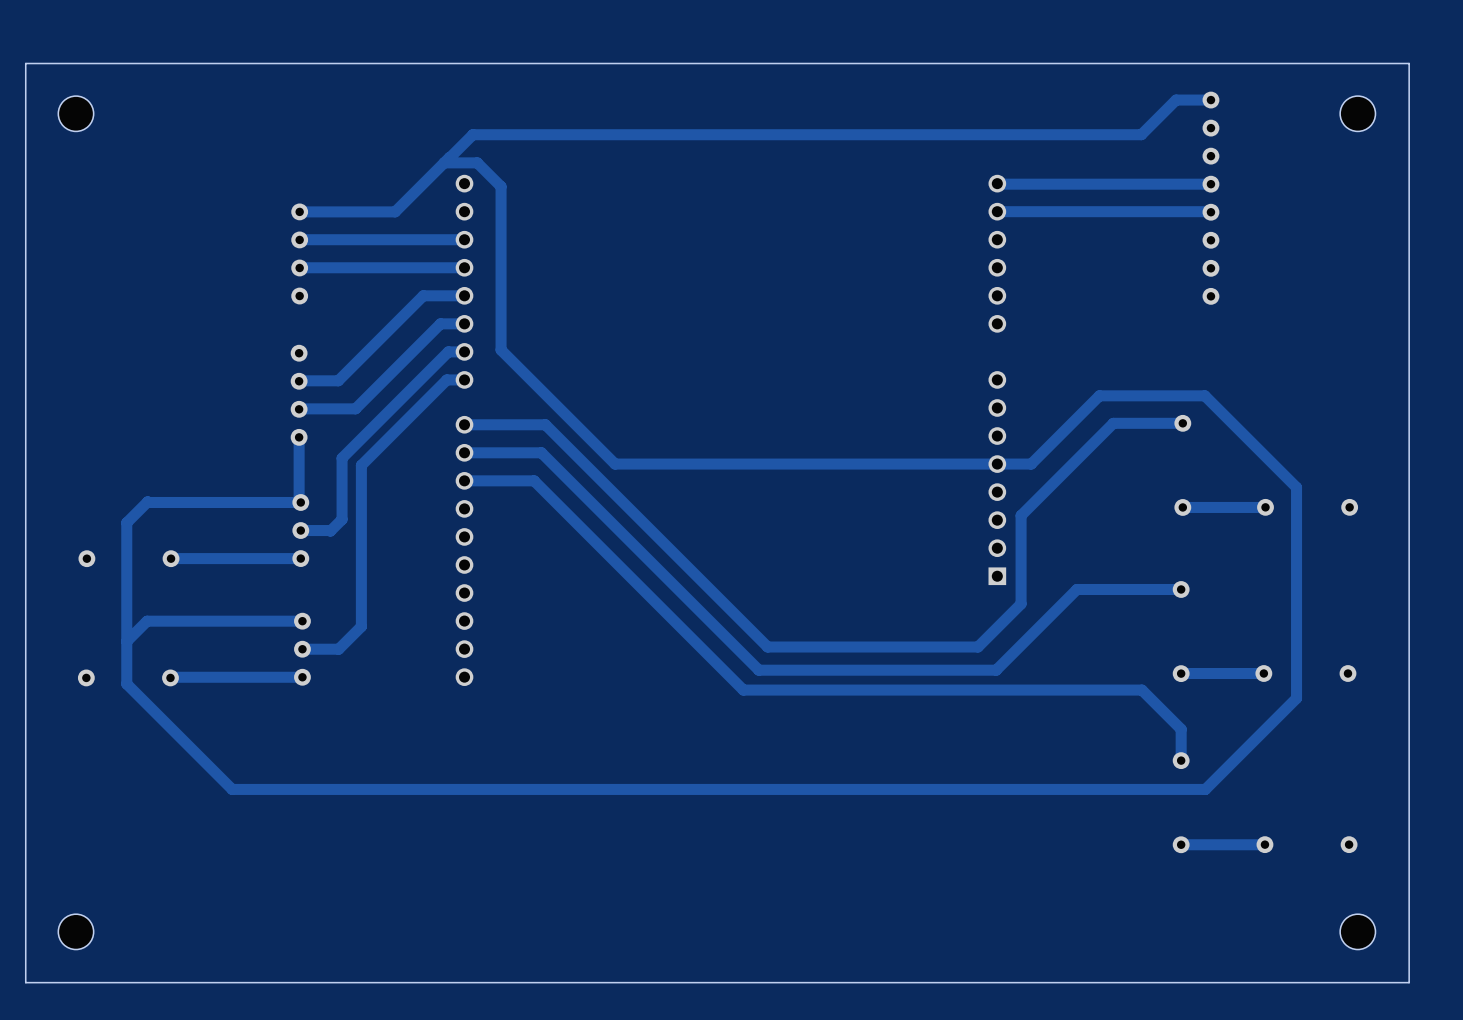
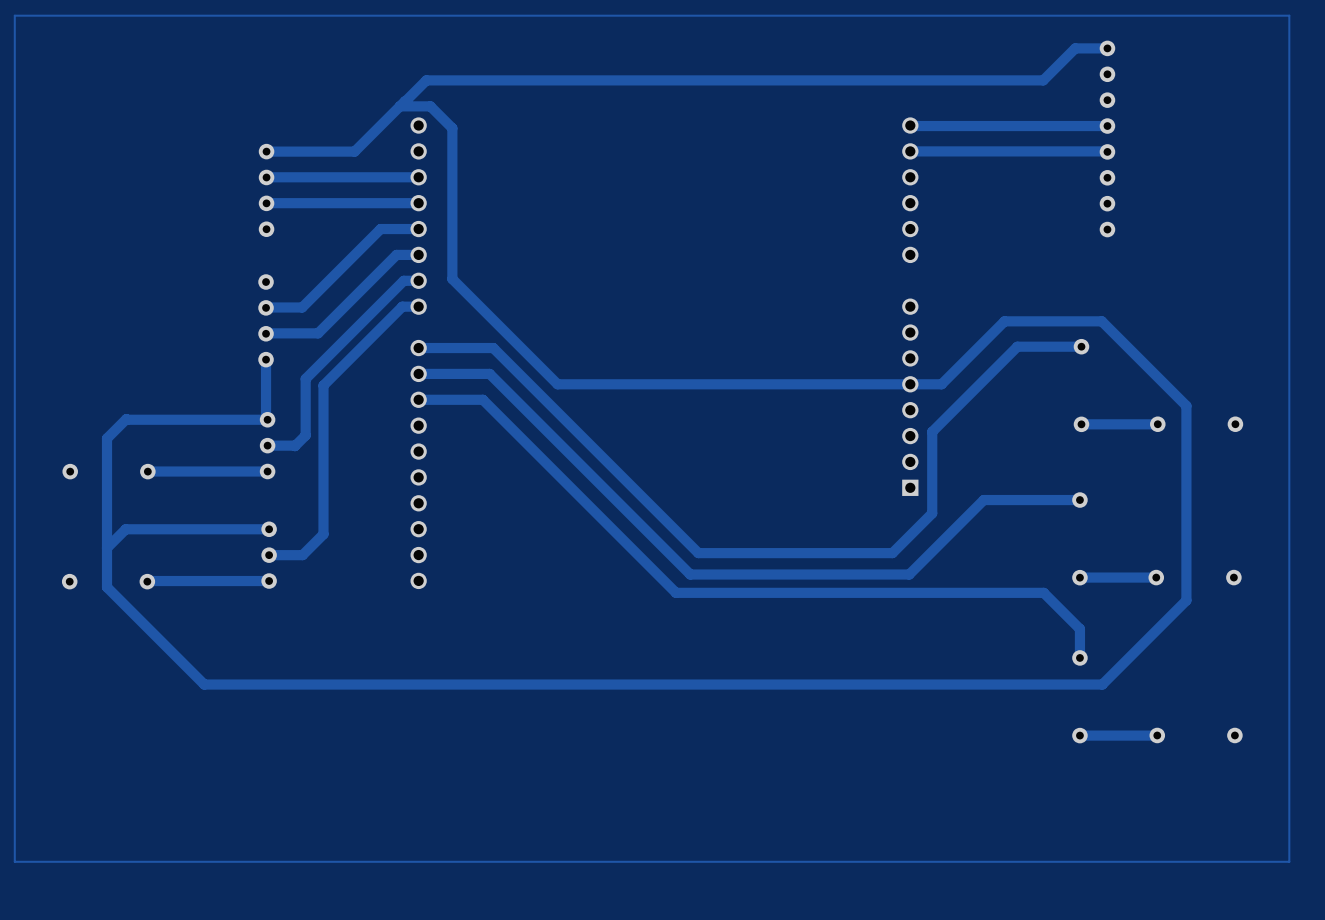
board edge: (1409, 63) (25, 63) (25, 982) (1409, 982) (1409, 63) -> none
track: none -> (1289, 15) (14, 15) (14, 861) (1289, 861) (1289, 15)
part: (75, 113) -> none
part: (1357, 113) -> none
part: (75, 931) -> none
part: (1357, 931) -> none

